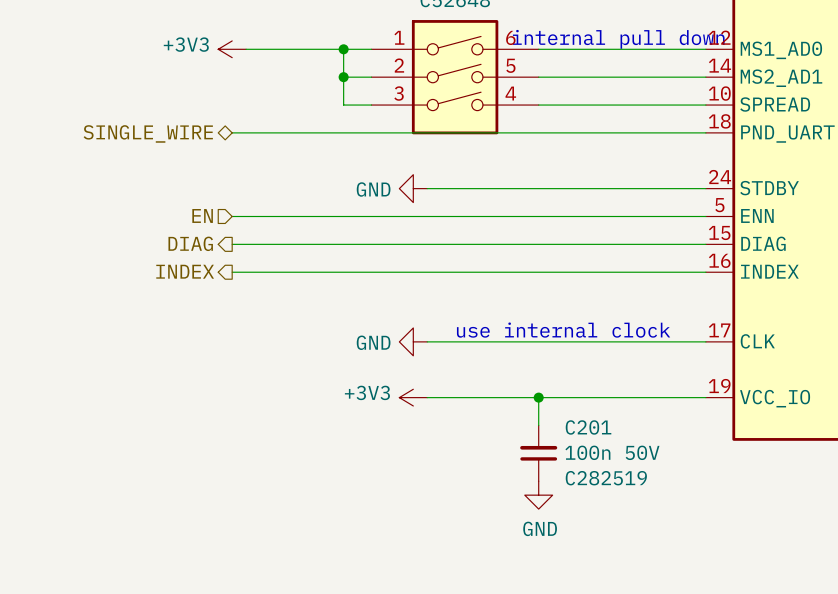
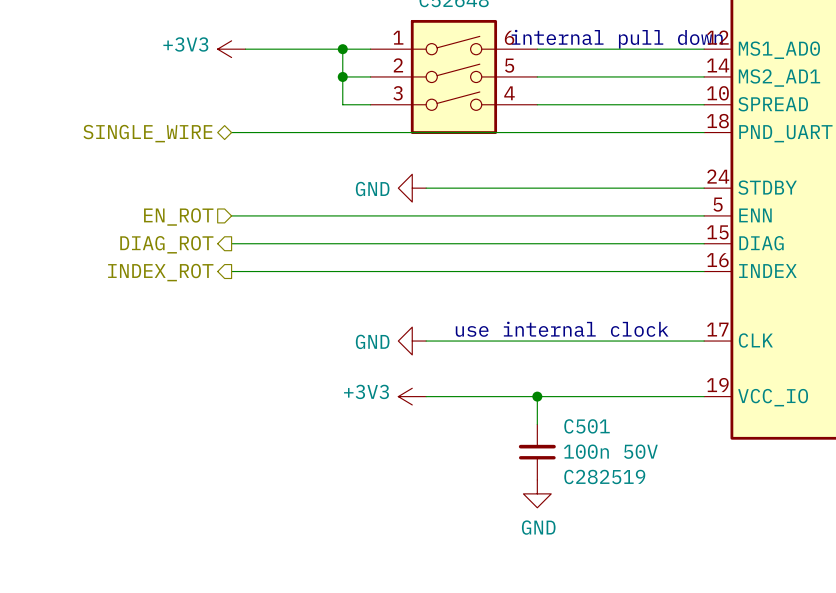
hierarchical label: EN (202, 215) -> EN_ROT (178, 216)
hierarchical label: DIAG (190, 243) -> DIAG_ROT (166, 244)
hierarchical label: INDEX (185, 271) -> INDEX_ROT (160, 272)
C201 name: C201 (588, 427) -> C501 (587, 426)

